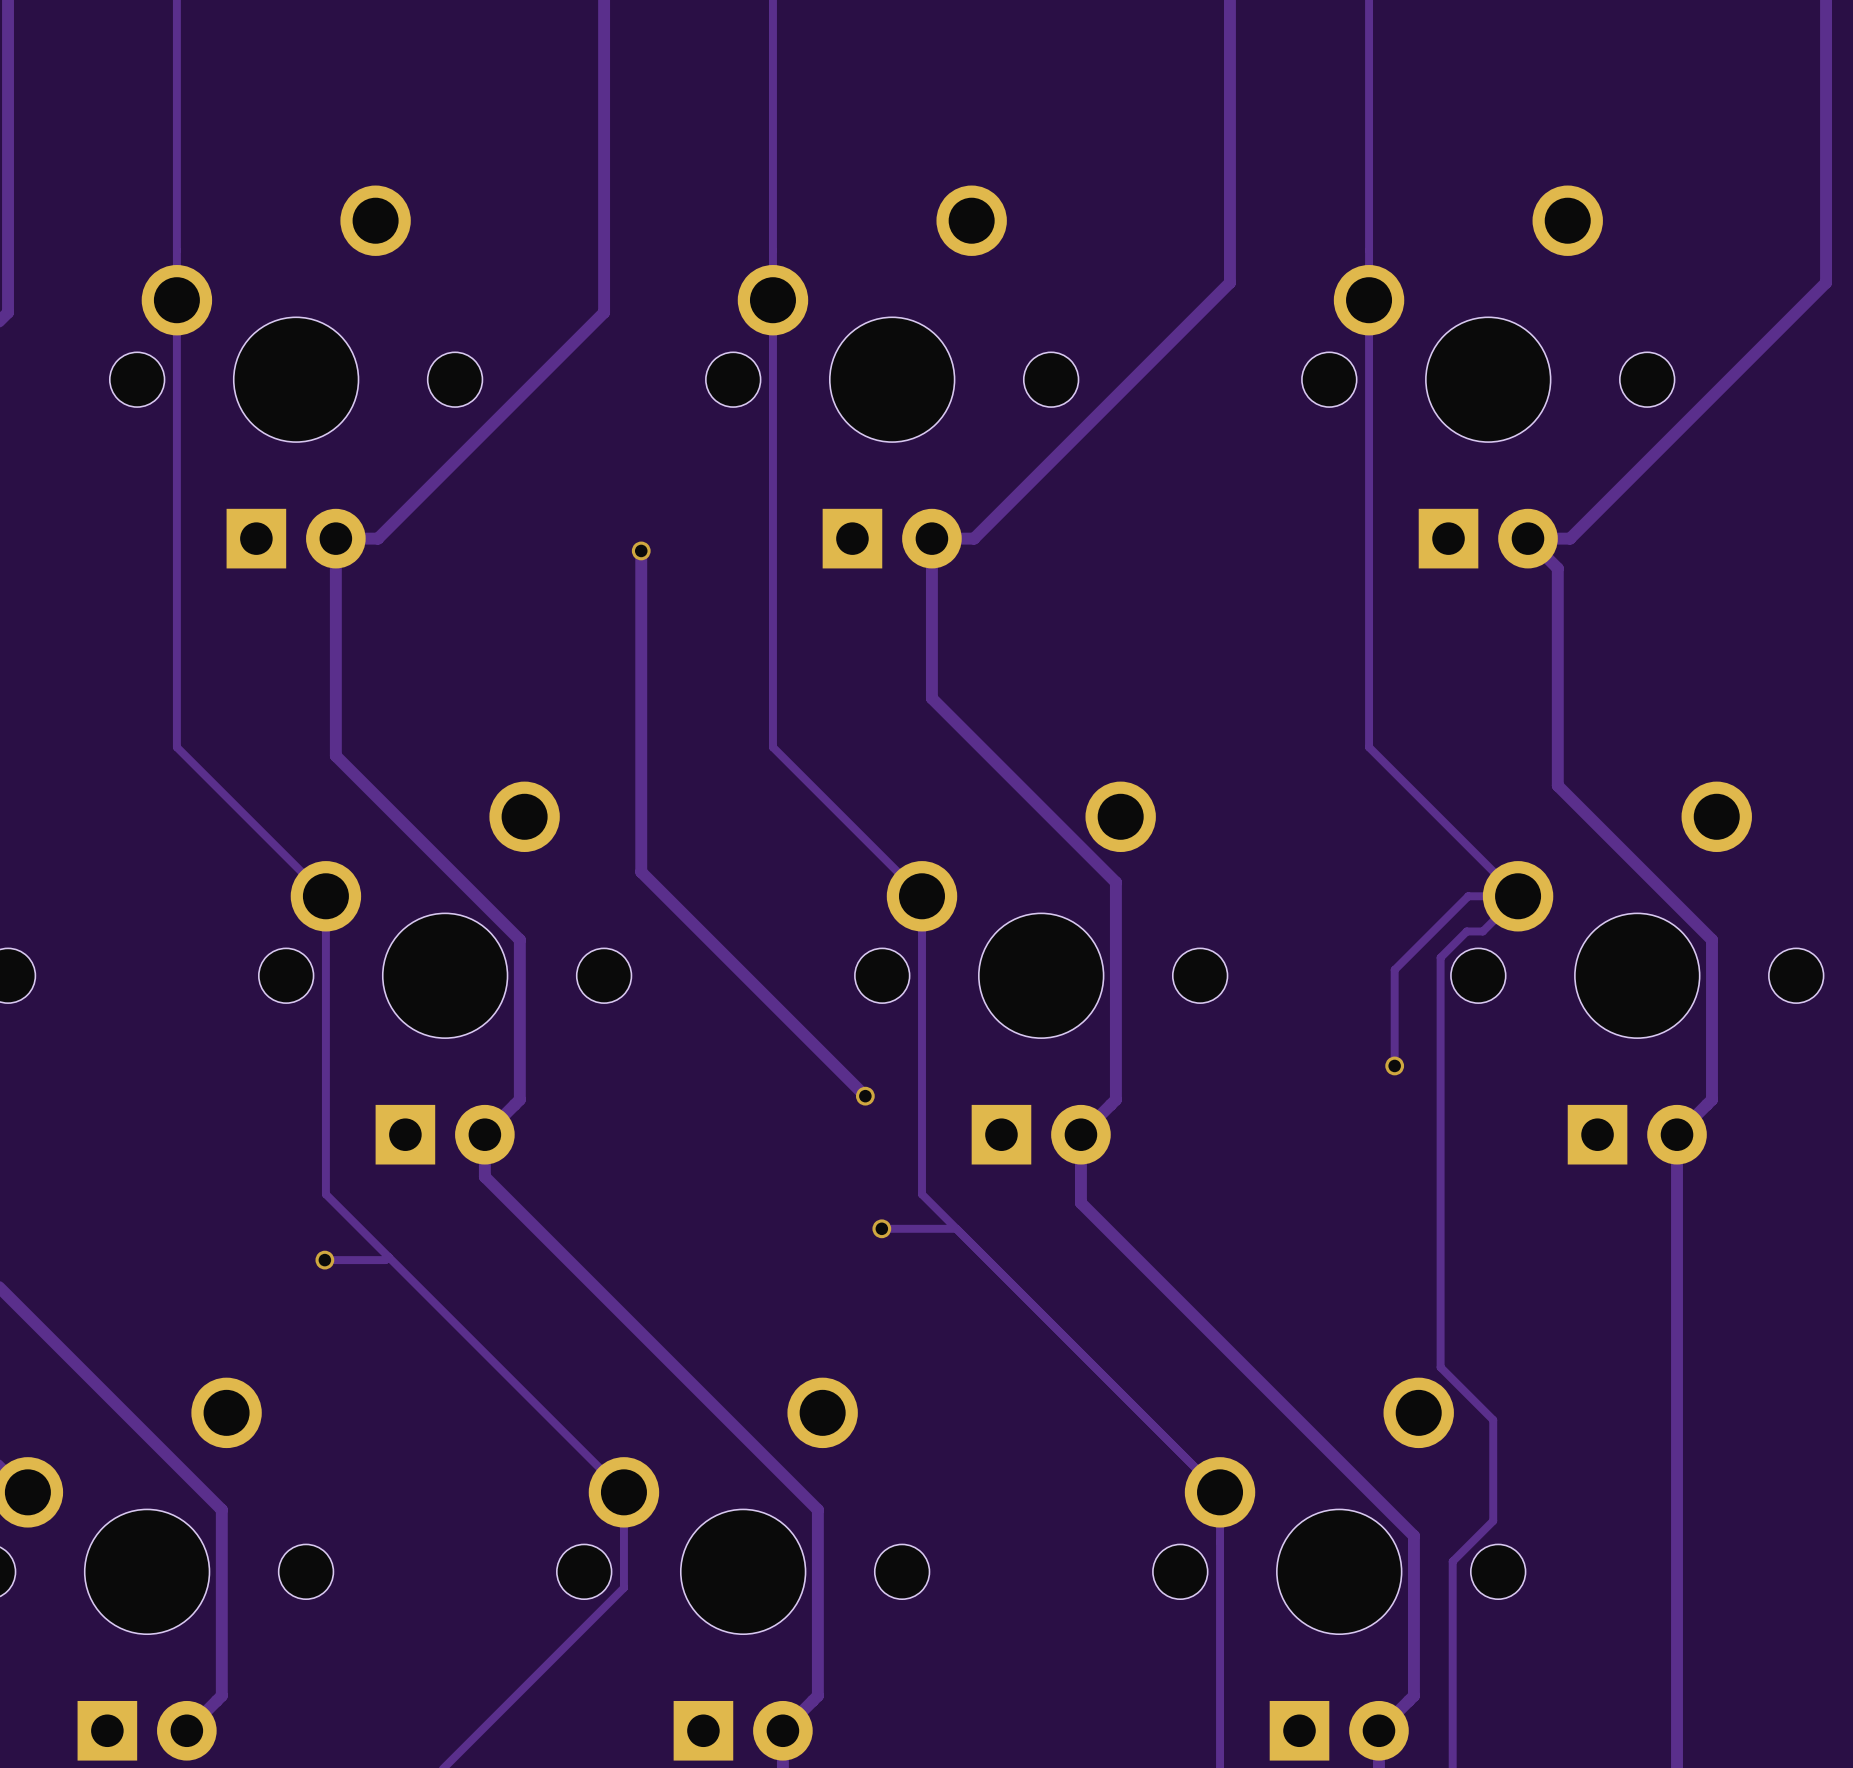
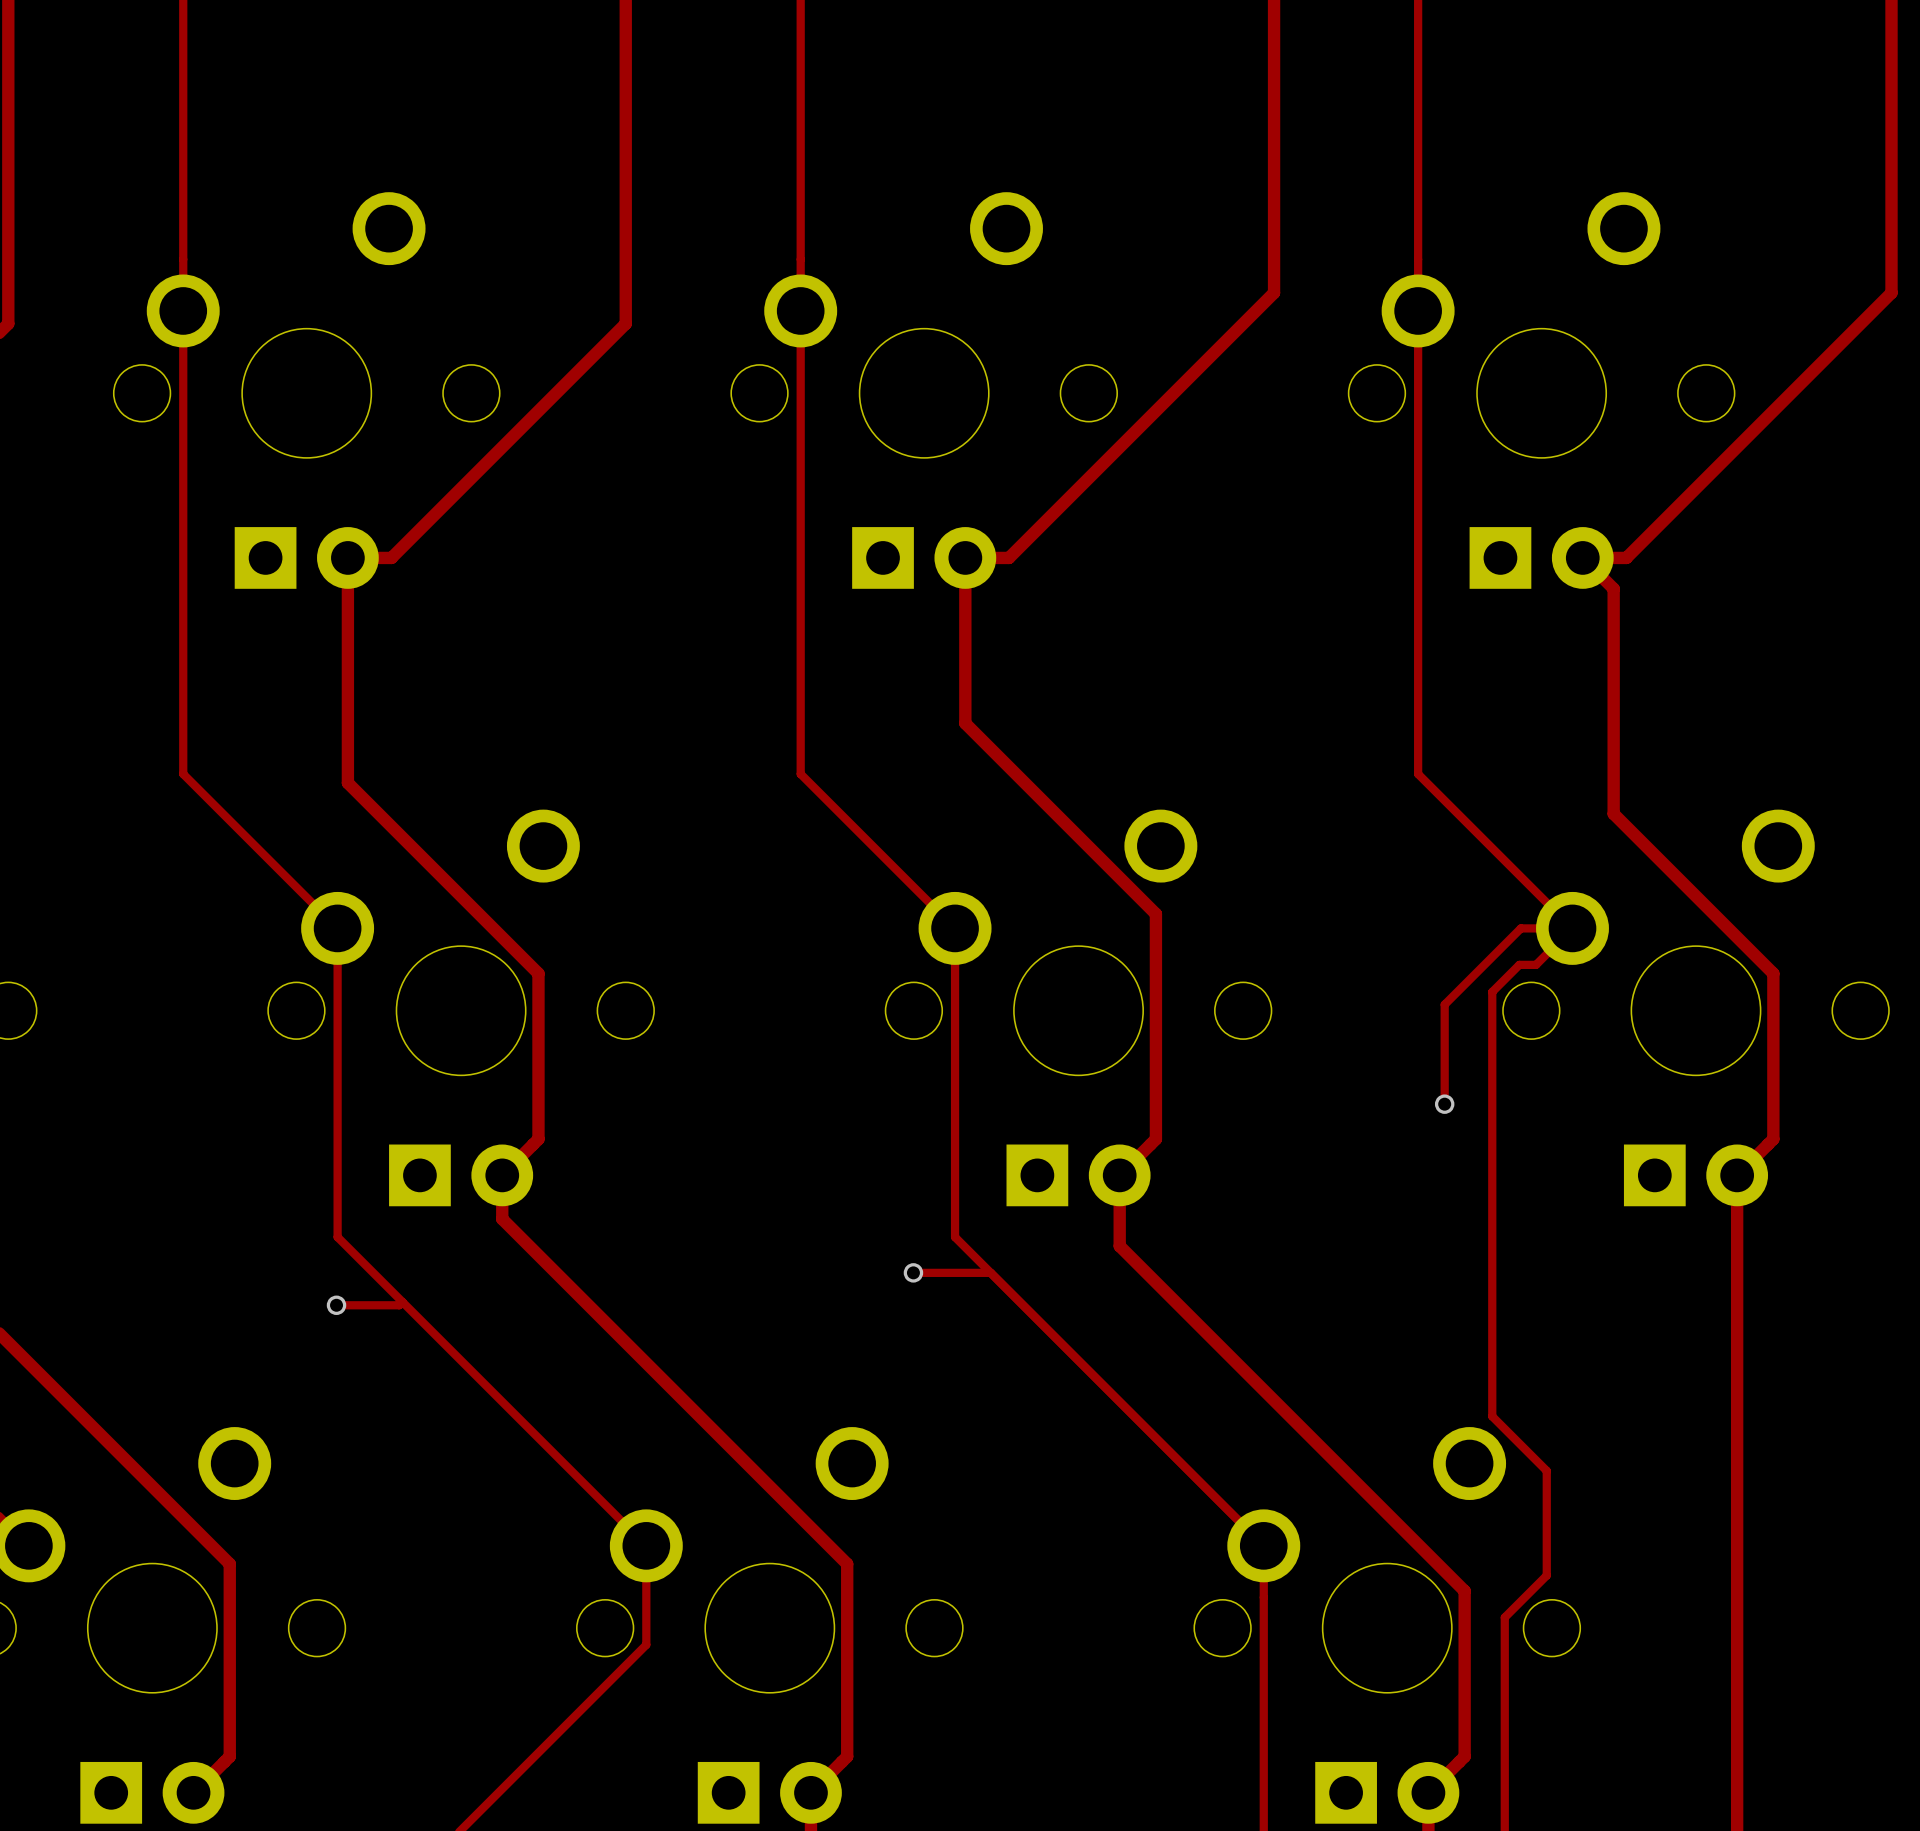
track: (641, 550) (641, 872) (865, 1096) -> none
via: (641, 550) -> none
via: (865, 1096) -> none

